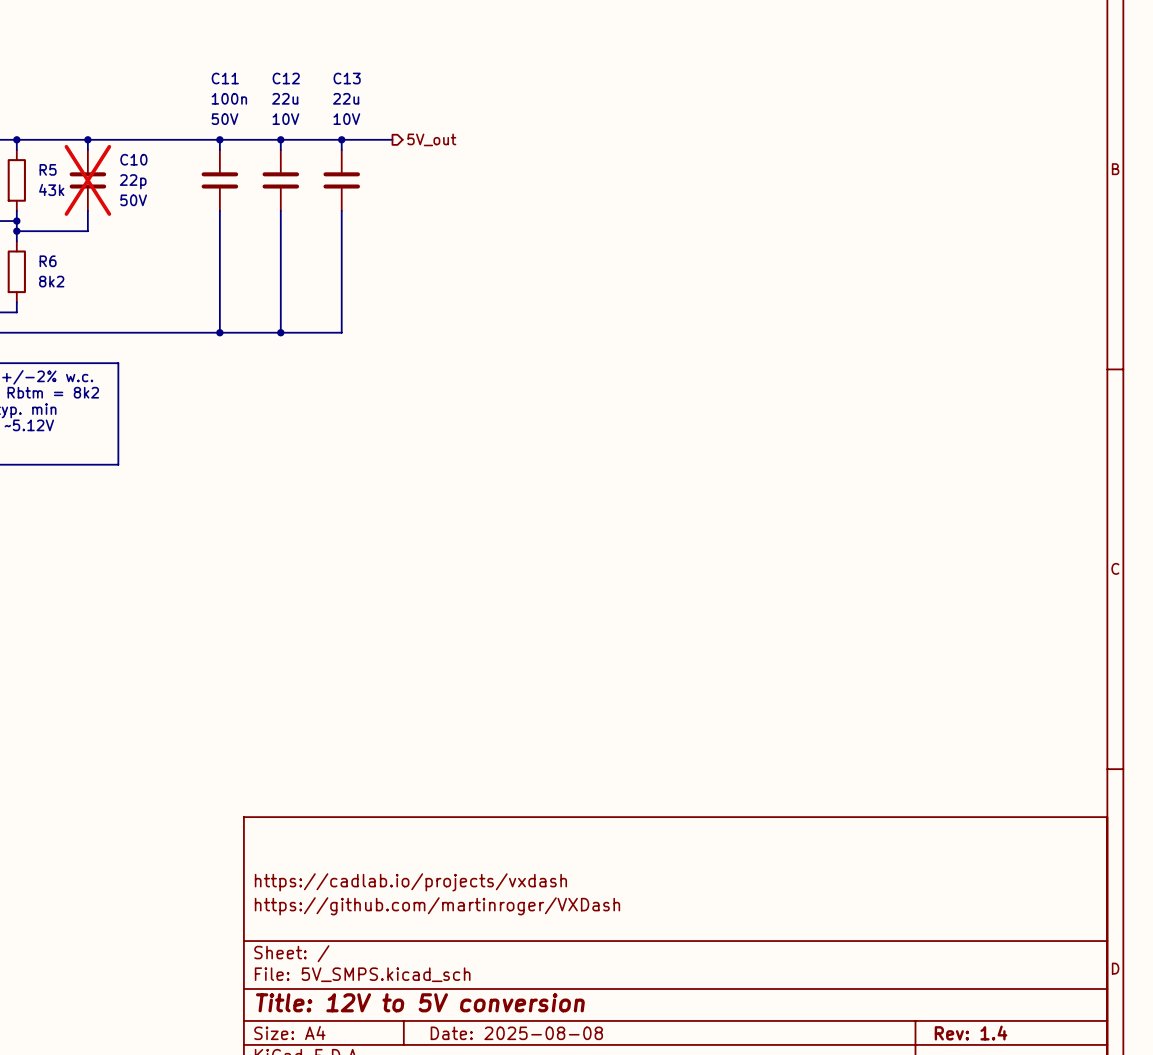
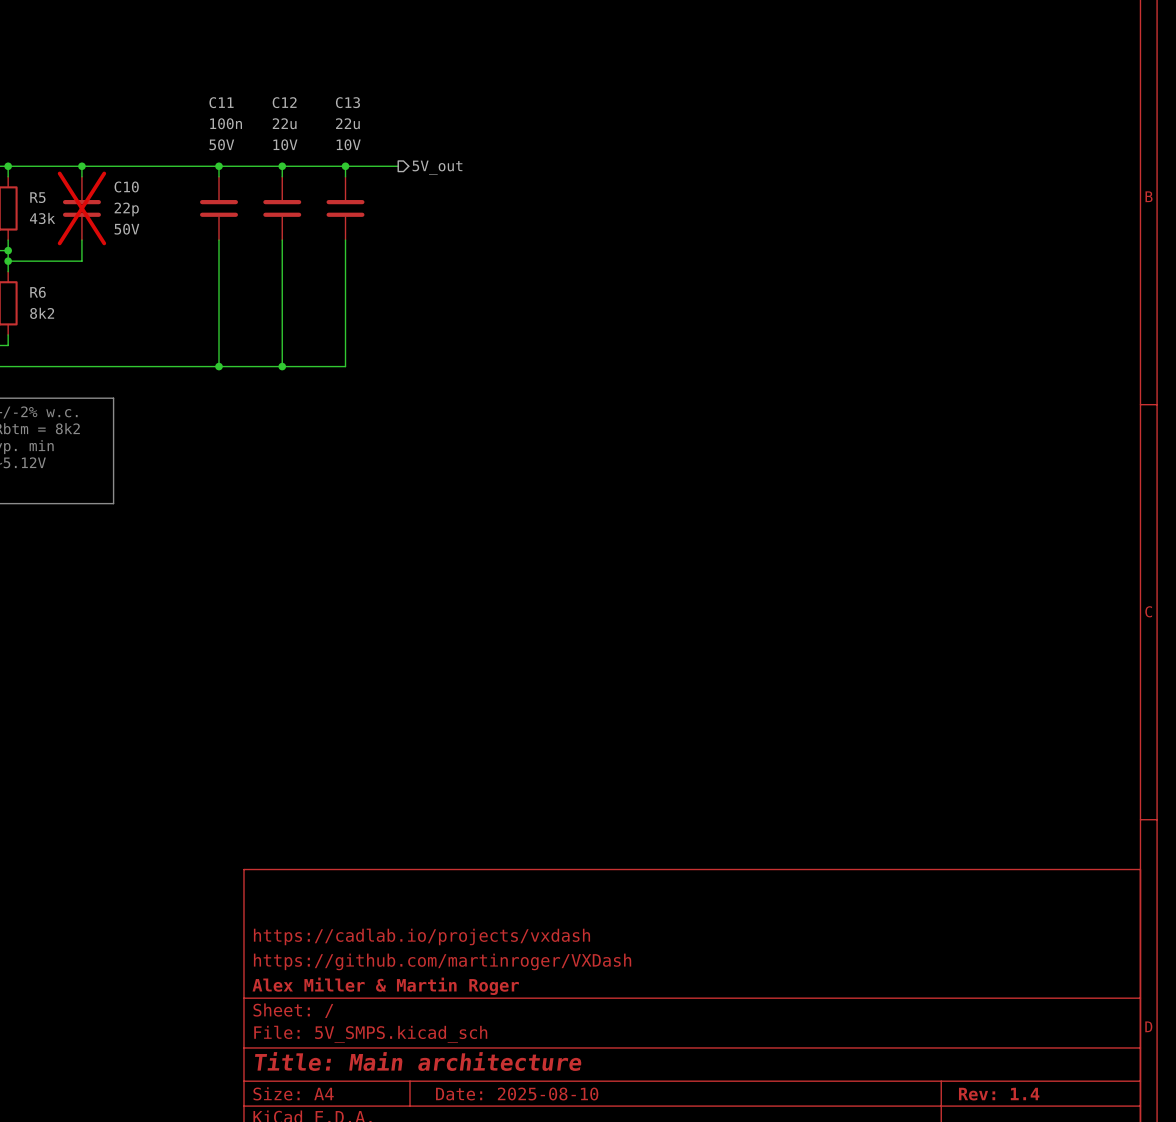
title block: none -> Alex Miller & Martin Roger (385, 986)
title block: Title: 12V to 5V conversion (420, 1002) -> Title: Main architecture (418, 1061)
title block: Date: 2025-08-08 (516, 1033) -> Date: 2025-08-10 (517, 1094)

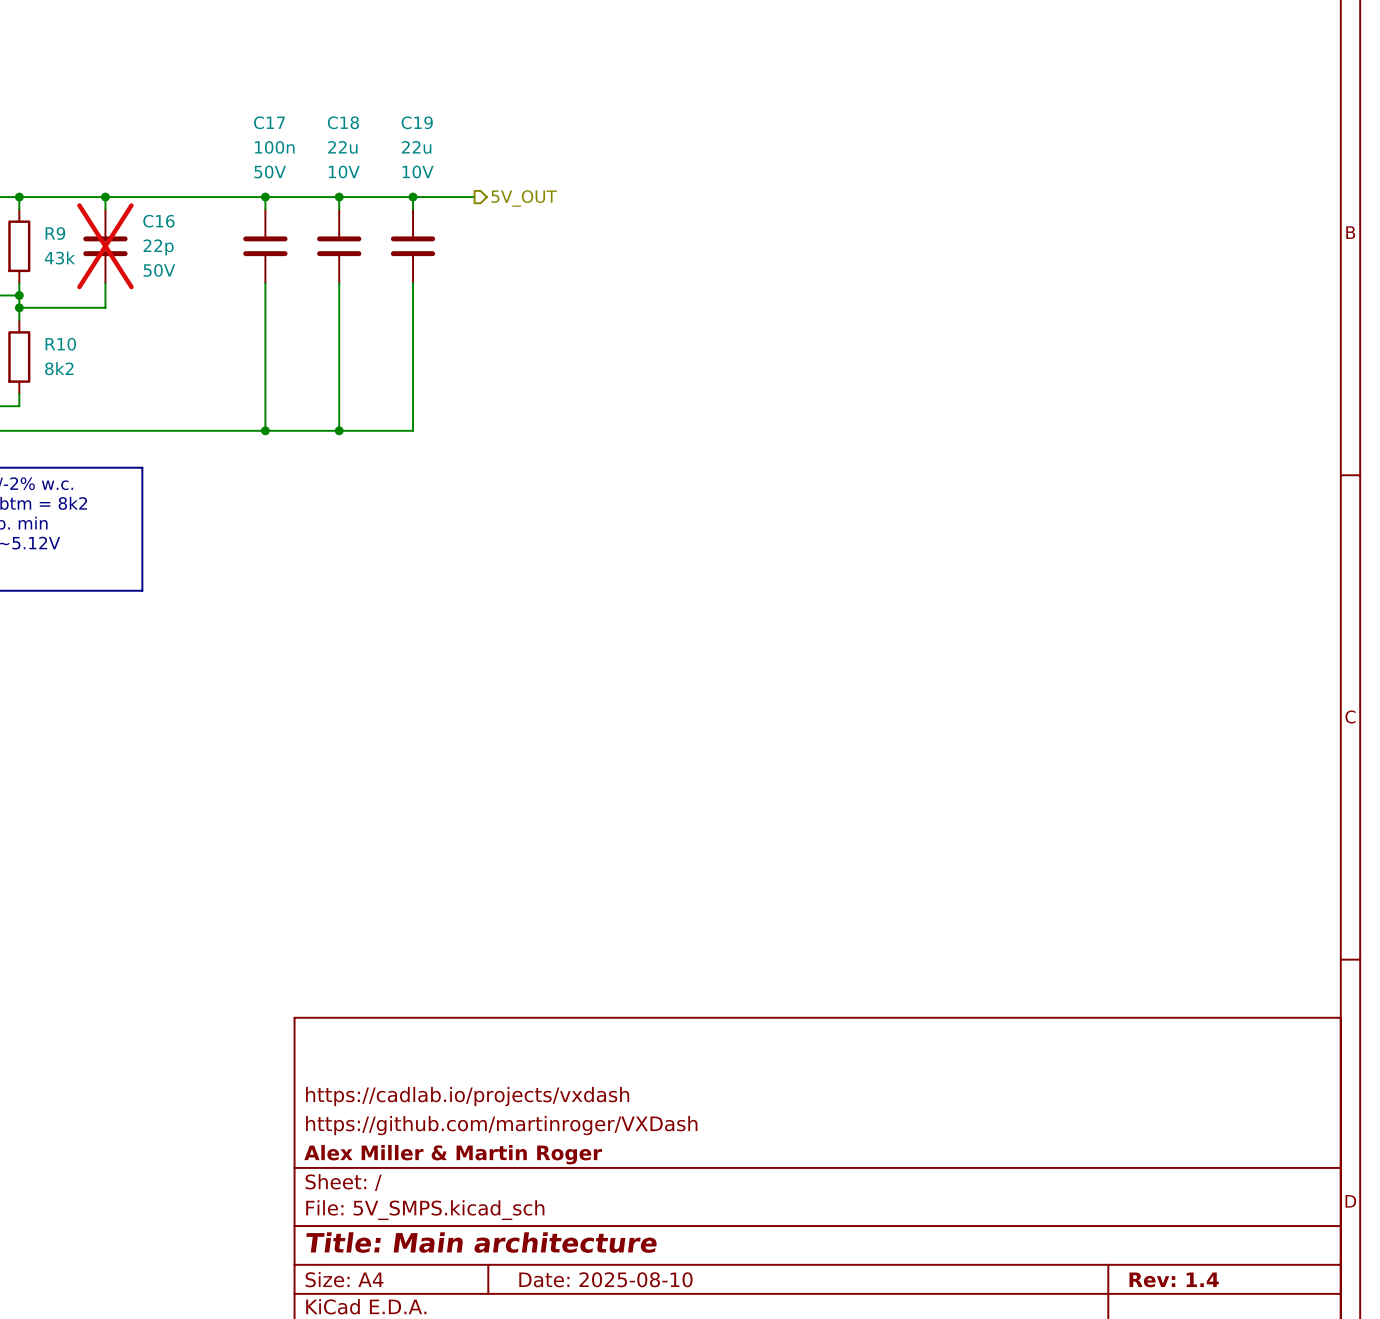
C11 name: C11 (221, 102) -> C17 (269, 122)
C12 name: C12 (284, 102) -> C18 (343, 122)
C13 name: C13 (347, 102) -> C19 (417, 122)
hierarchical label: 5V_out (437, 167) -> 5V_OUT (524, 198)
C10 name: C10 (126, 186) -> C16 (158, 221)
R5 name: R5 (37, 197) -> R9 (55, 233)
R6 name: R6 (37, 292) -> R10 (60, 344)

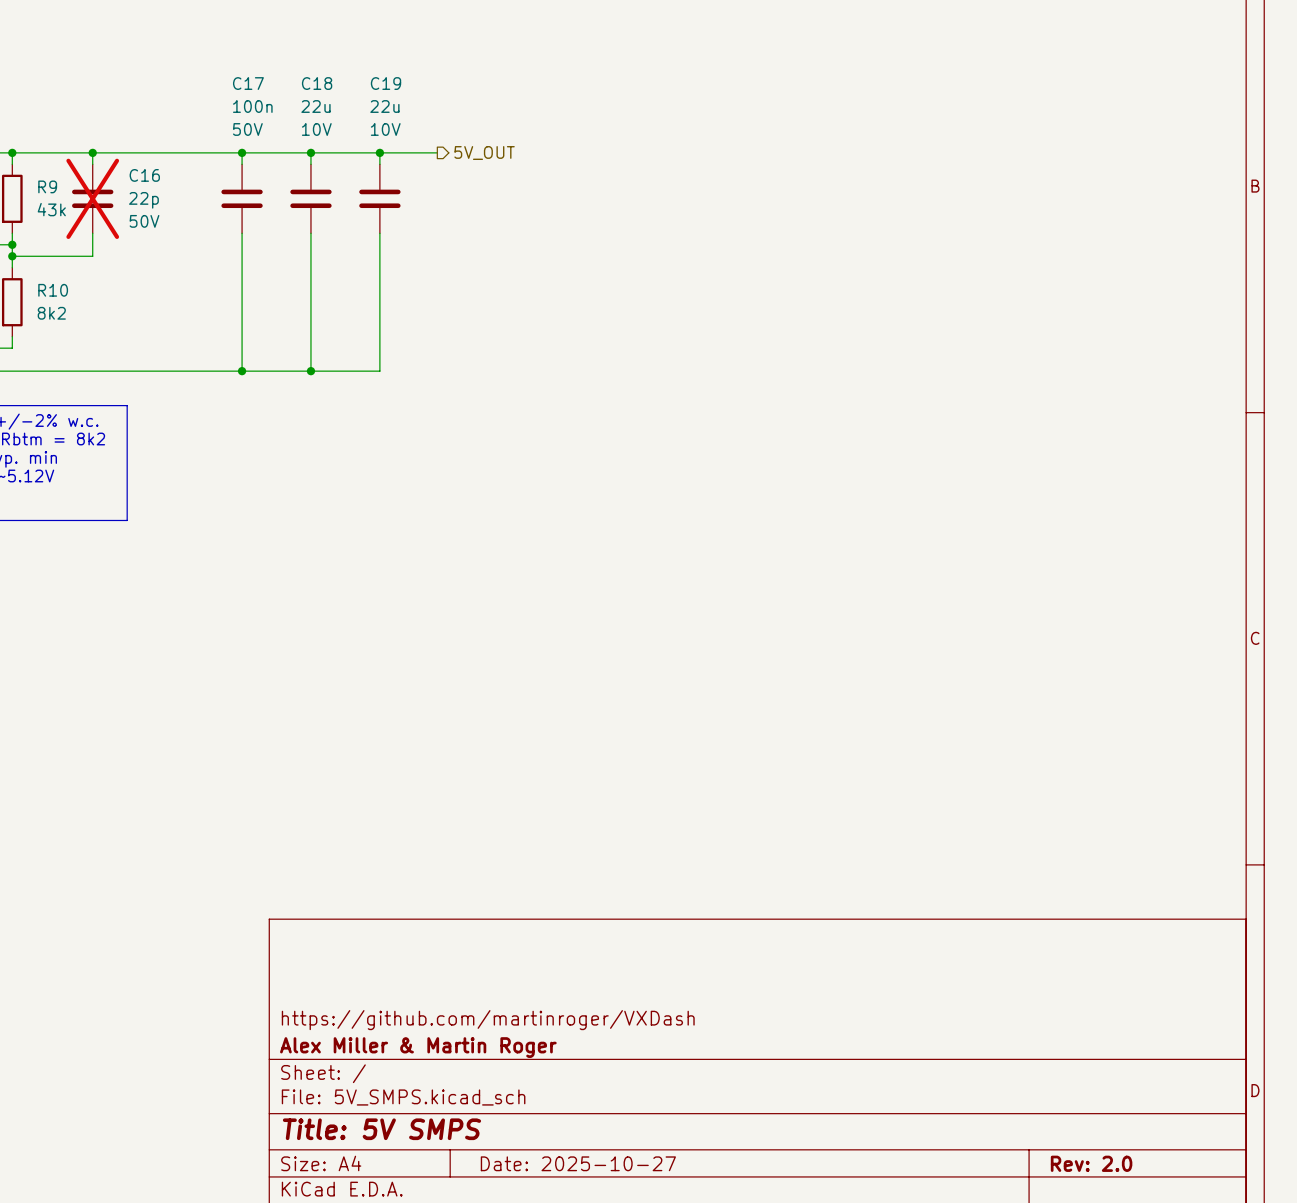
title block: https://cadlab.io/projects/vxdash (467, 1096) -> none
title block: Title: Main architecture (481, 1242) -> Title: 5V SMPS (381, 1129)
title block: Date: 2025-08-10 (605, 1279) -> Date: 2025-10-27 (578, 1163)
title block: Rev: 1.4 (1174, 1279) -> Rev: 2.0 (1091, 1163)

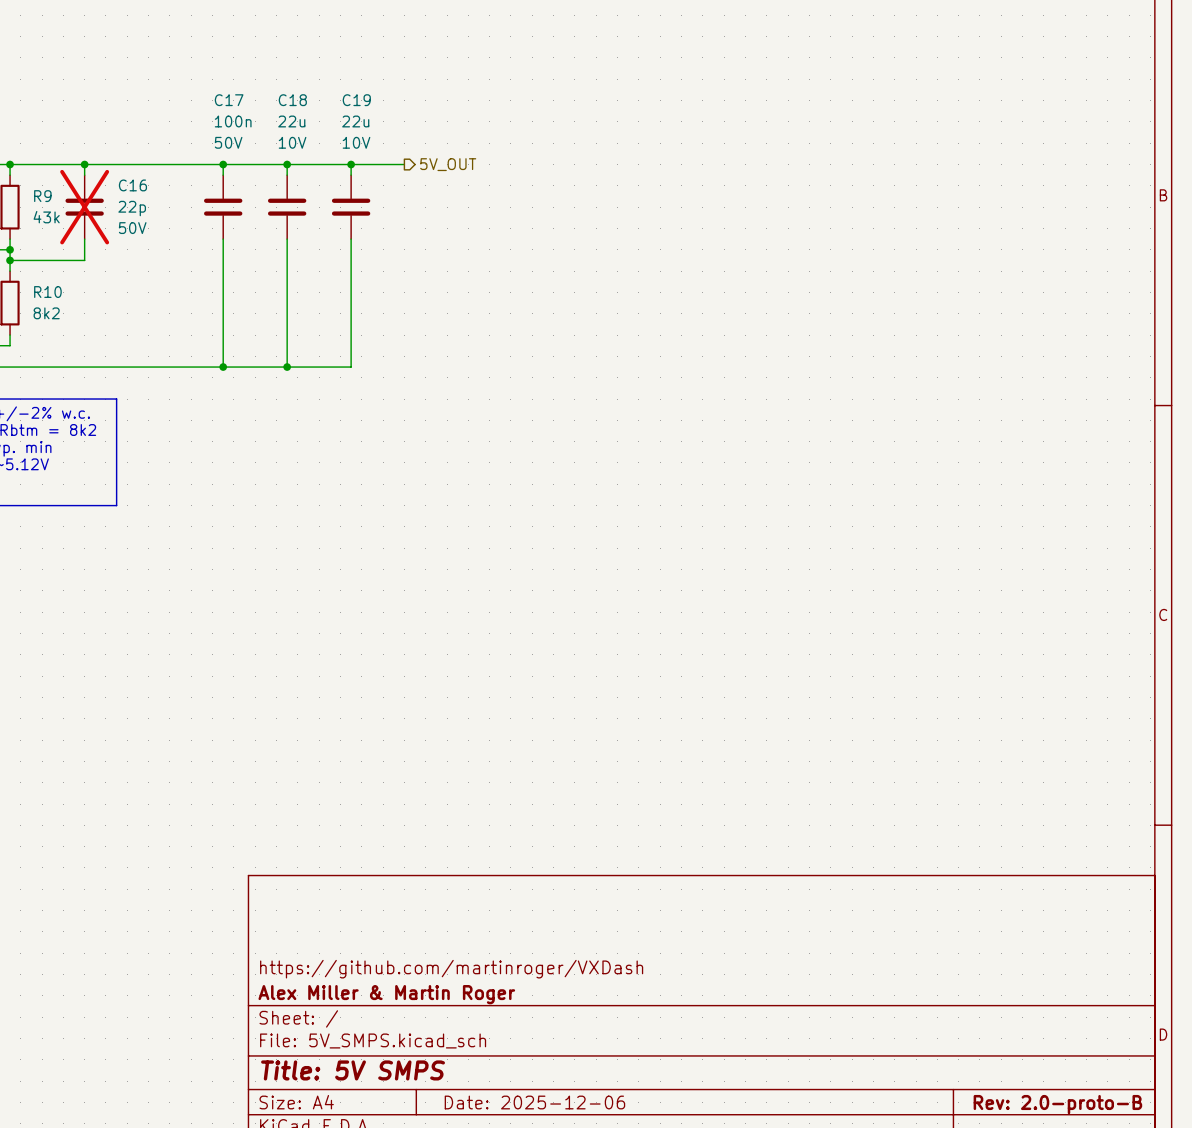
title block: Date: 2025-10-27 (578, 1163) -> Date: 2025-12-06 (534, 1102)
title block: Rev: 2.0 (1091, 1163) -> Rev: 2.0-proto-B (1057, 1104)

